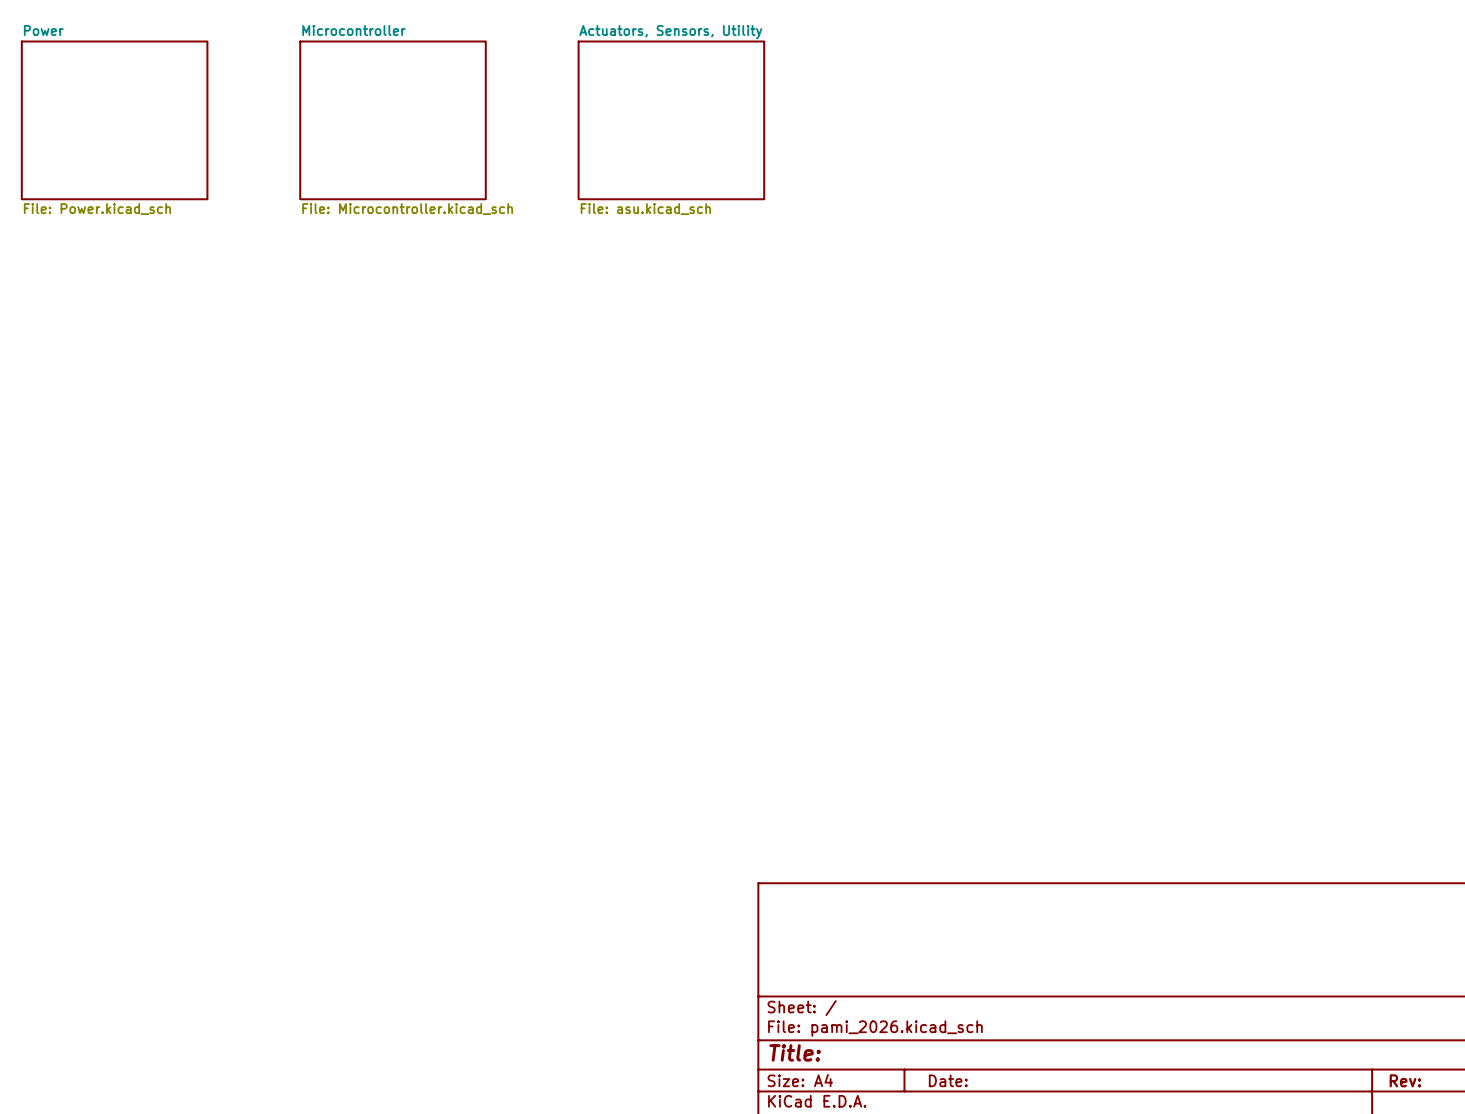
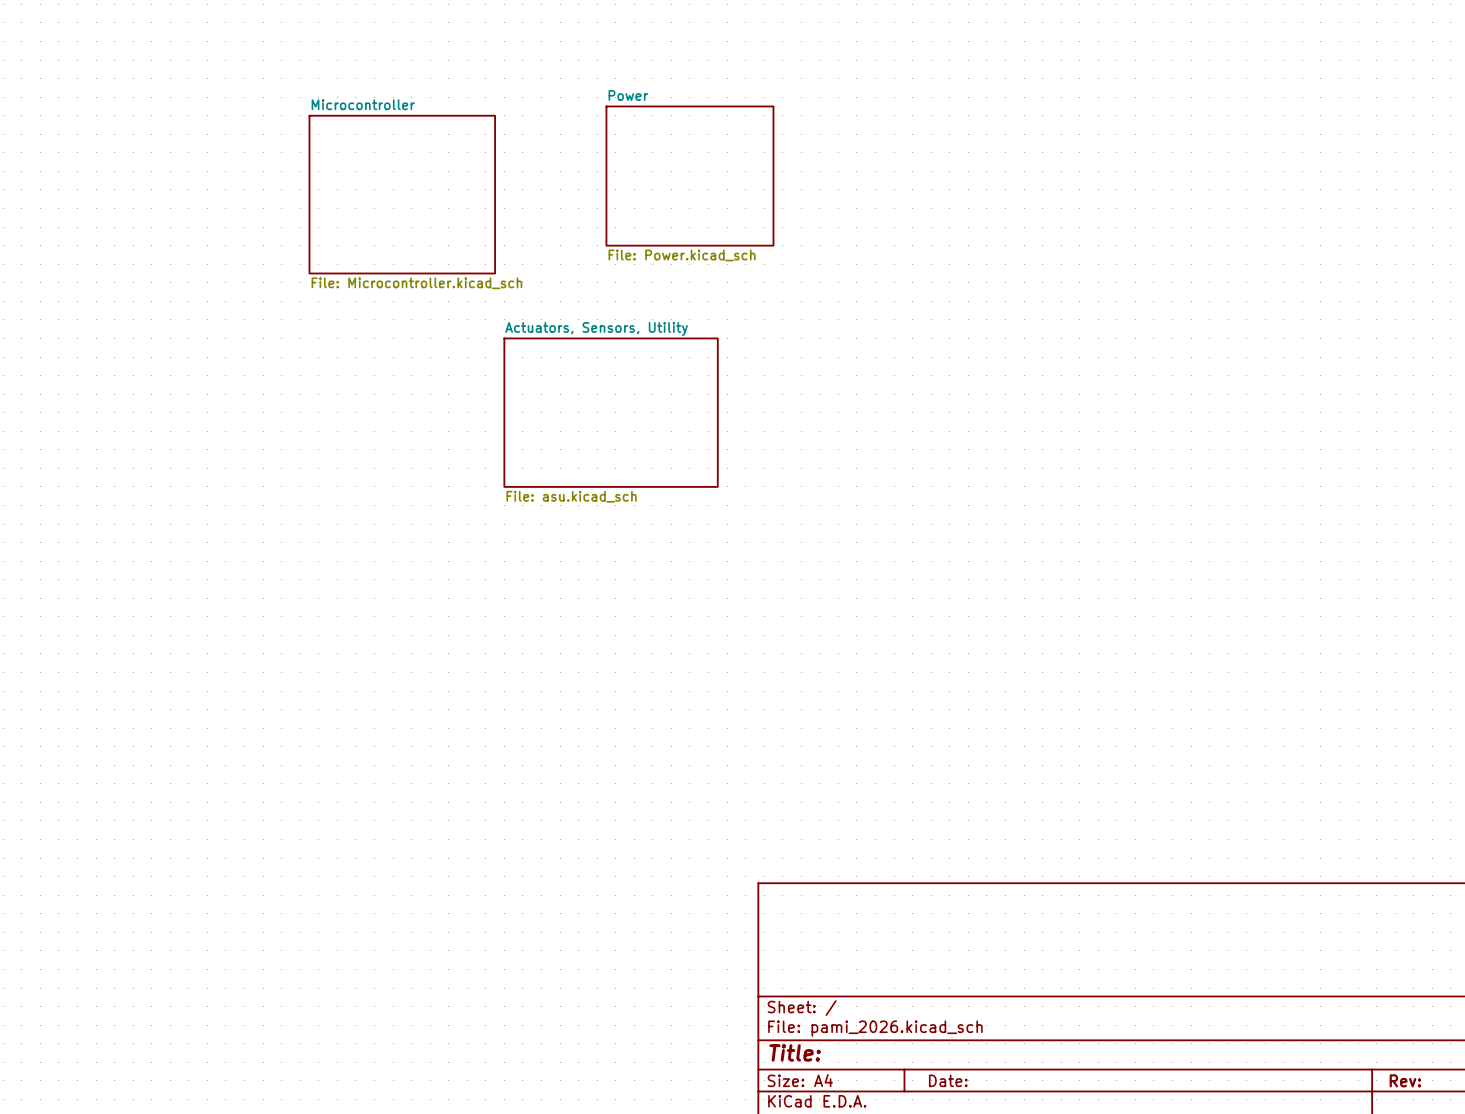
sheet Power: File: Power.kicad_sch (114, 120) -> none
sheet Microcontroller position: (393, 120) -> (402, 194)
sheet Actuators, Sensors, Utility: File: asu.kicad_sch (671, 120) -> none
sheet Power: none -> File: Power.kicad_sch (689, 176)
sheet Actuators, Sensors, Utility: none -> File: asu.kicad_sch (611, 412)

